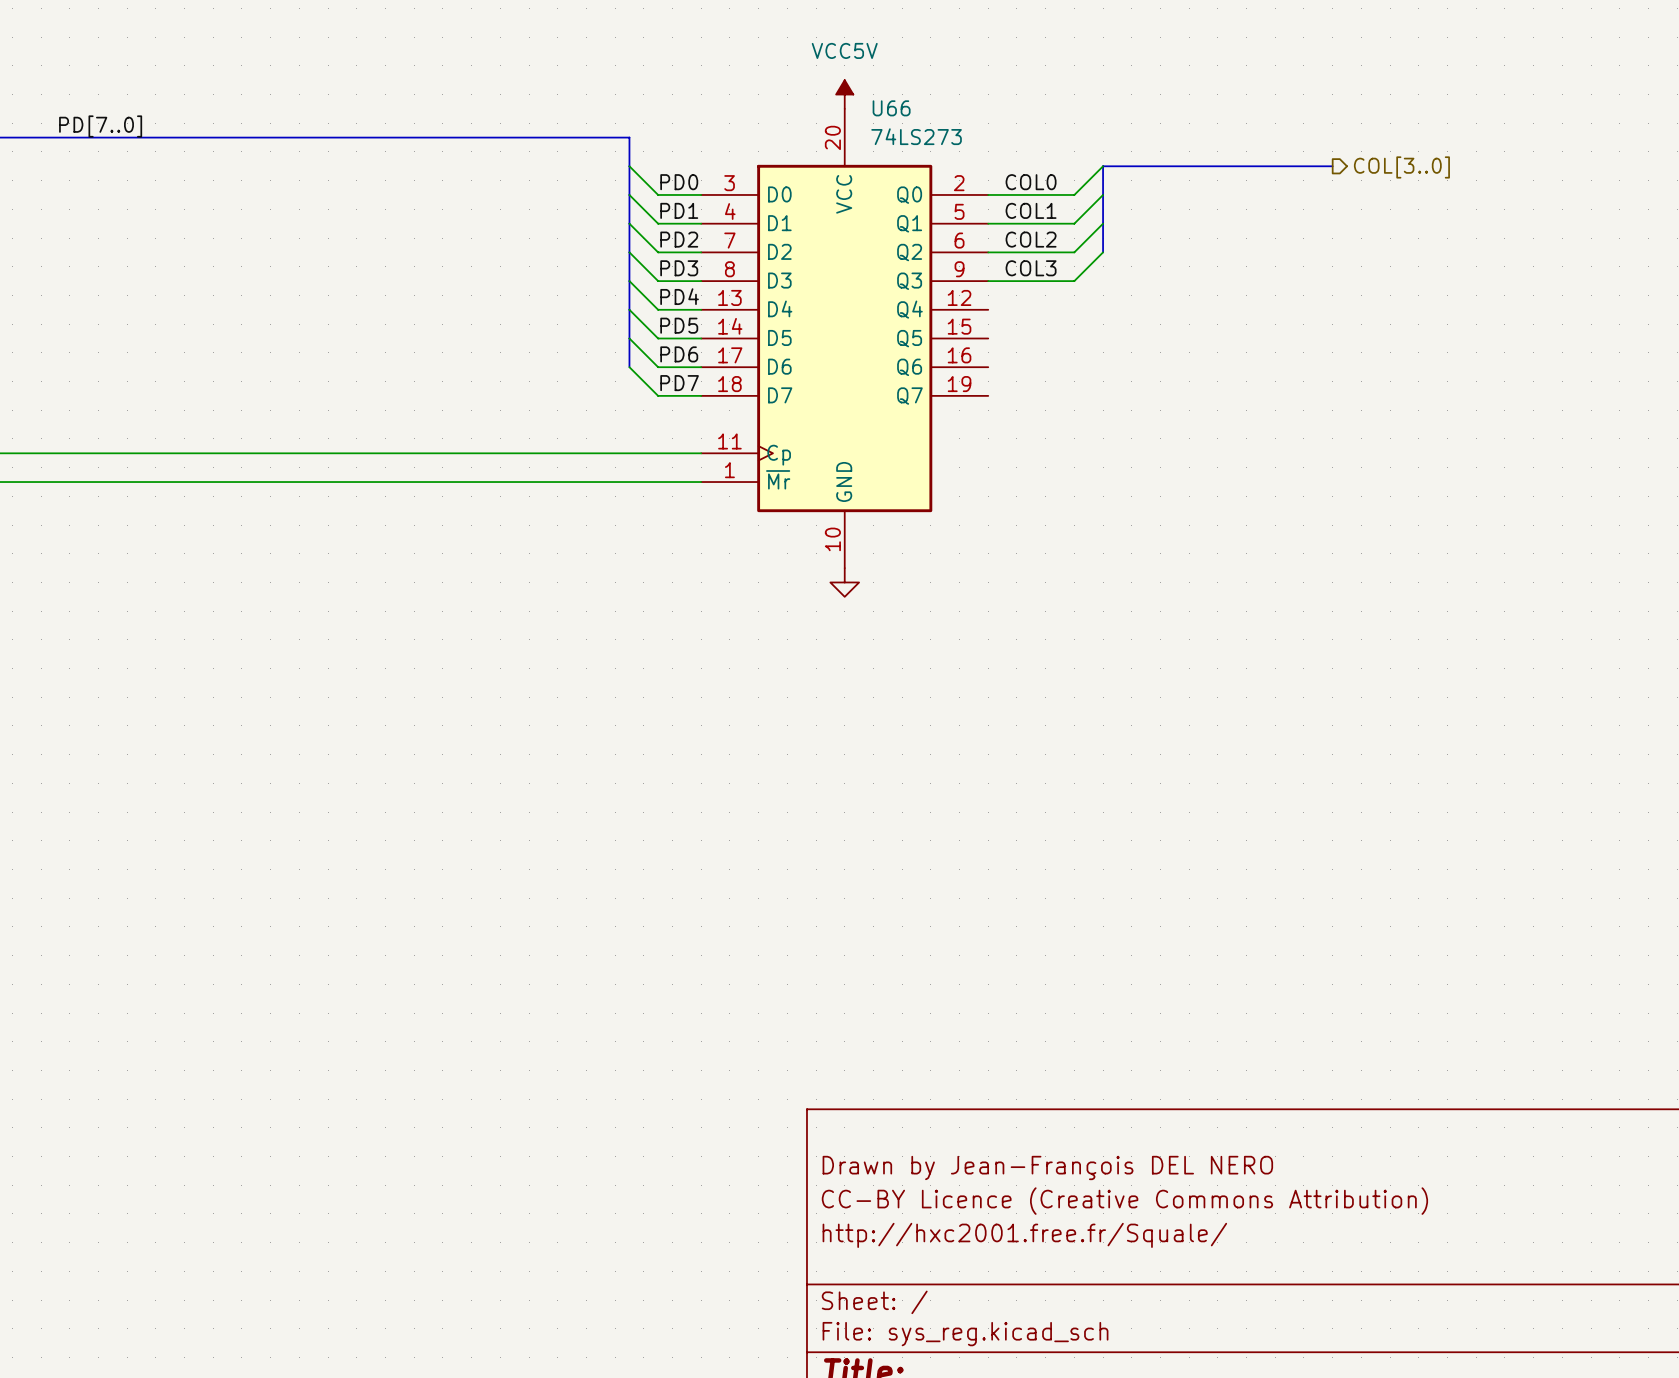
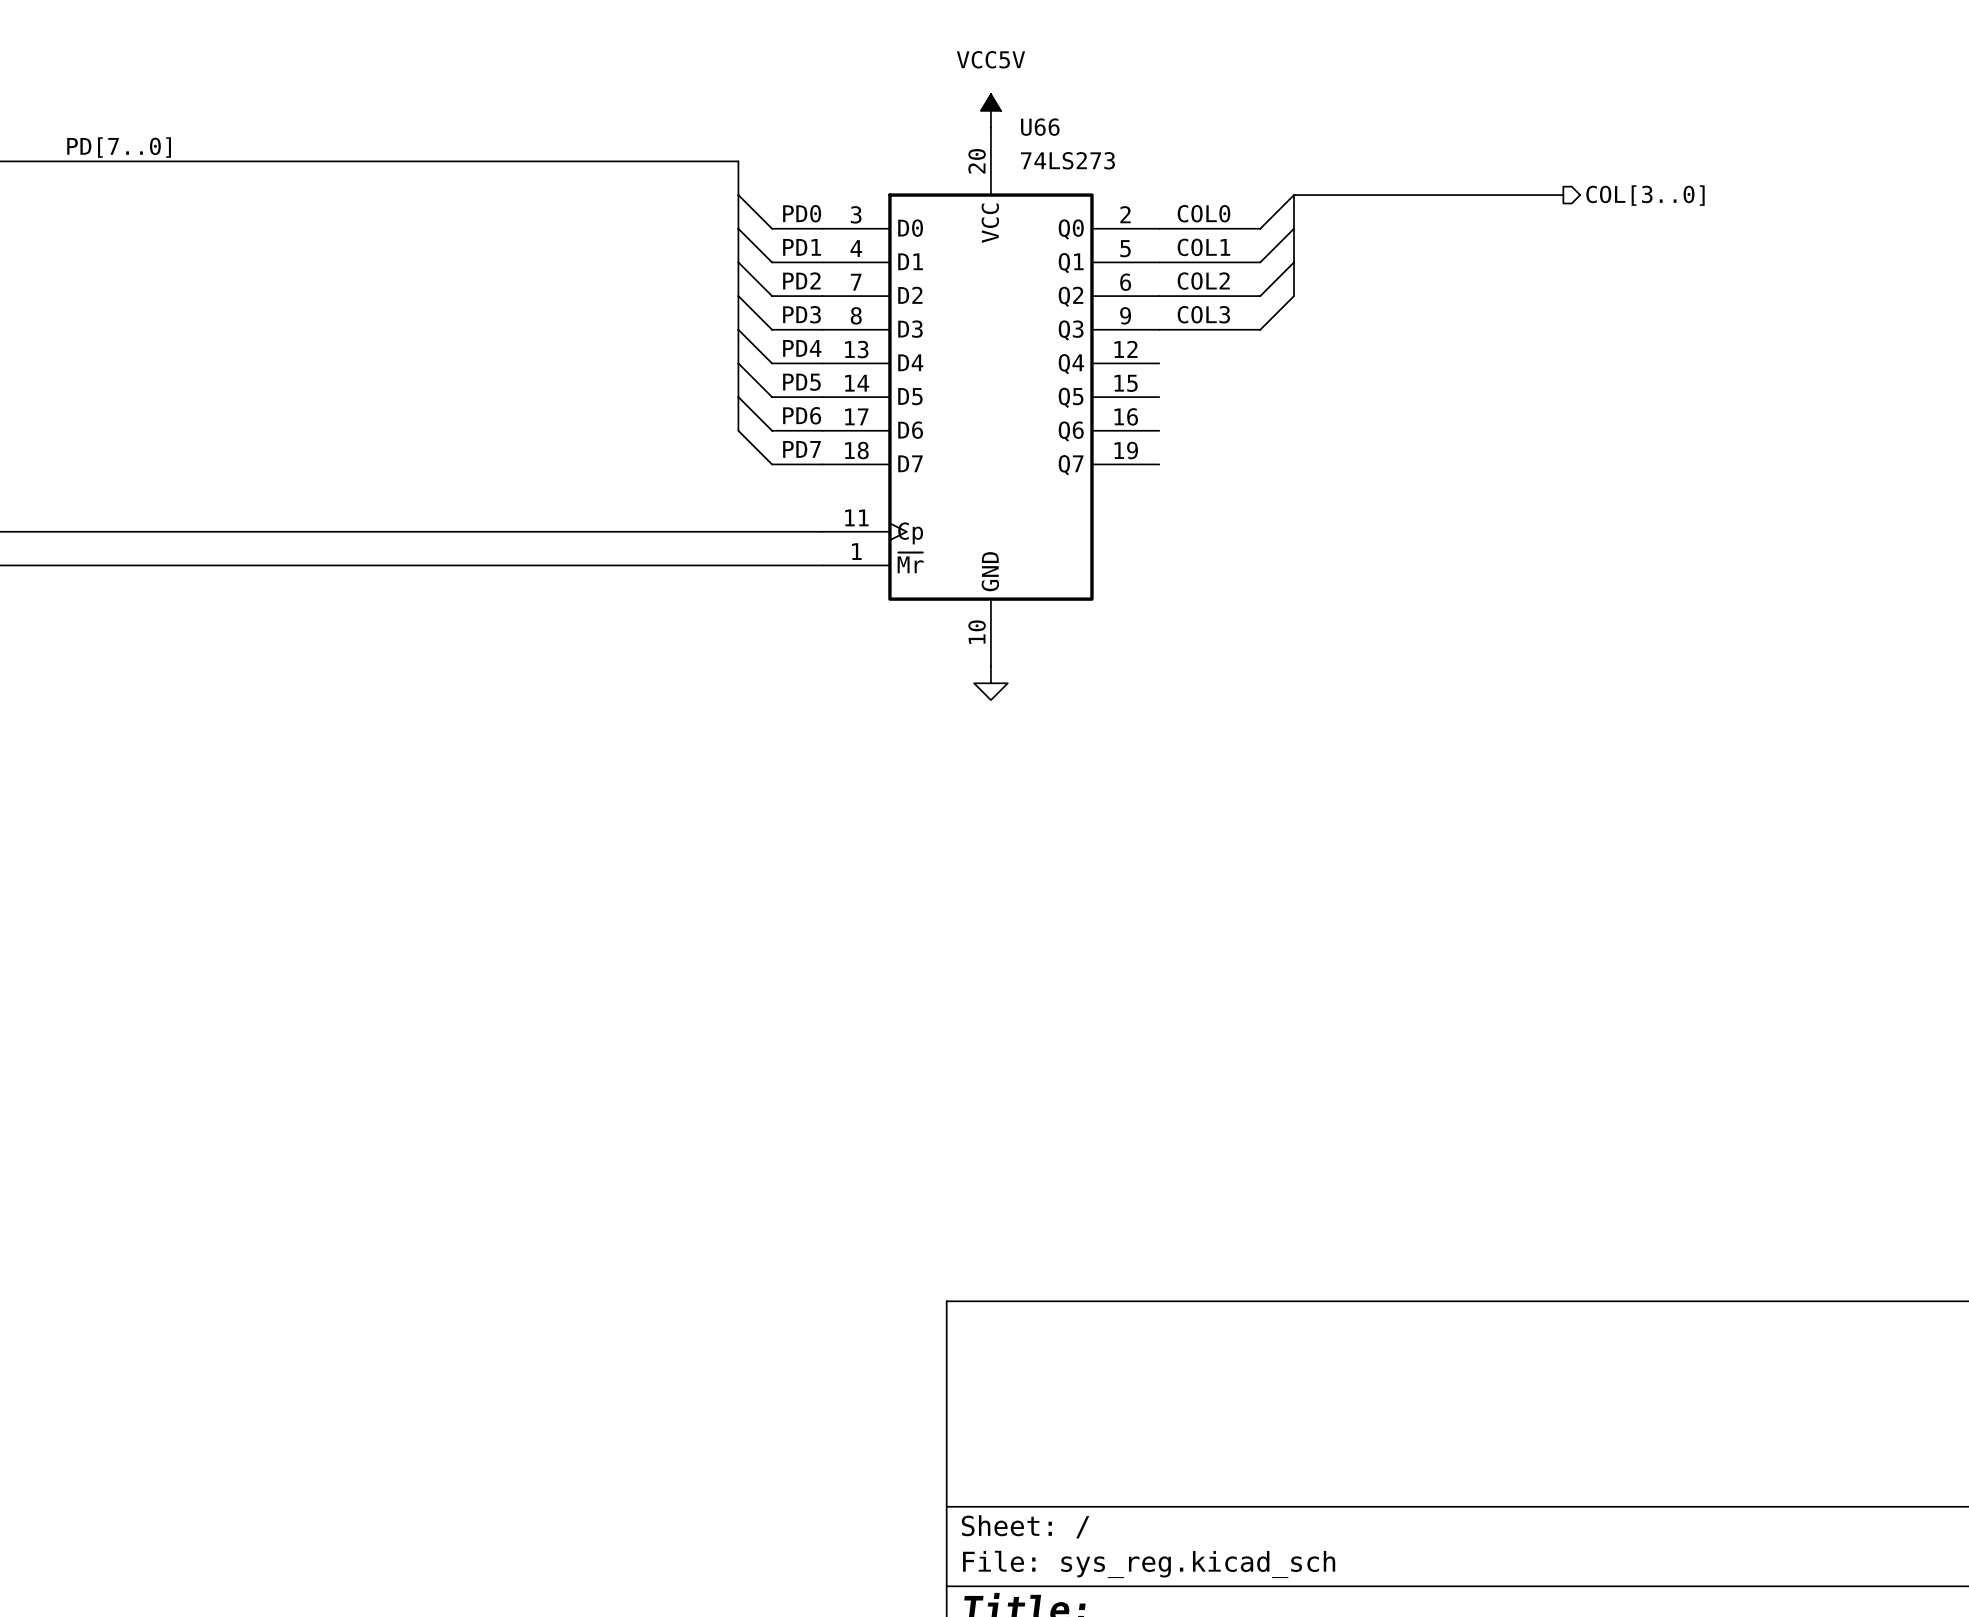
title block: Drawn by Jean-François DEL NERO (1047, 1167) -> none
title block: CC-BY Licence (Creative Commons Attribution) (1124, 1201) -> none
title block: http://hxc2001.free.fr/Squale/ (1024, 1235) -> none

